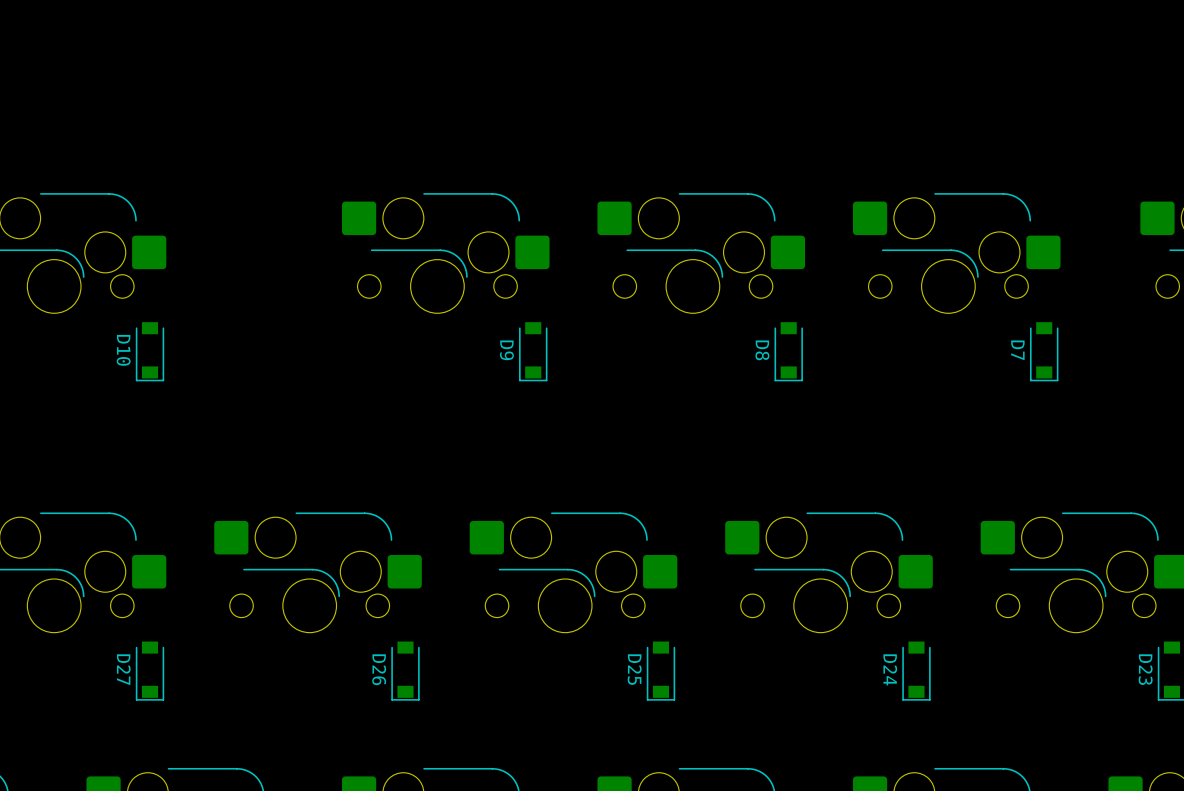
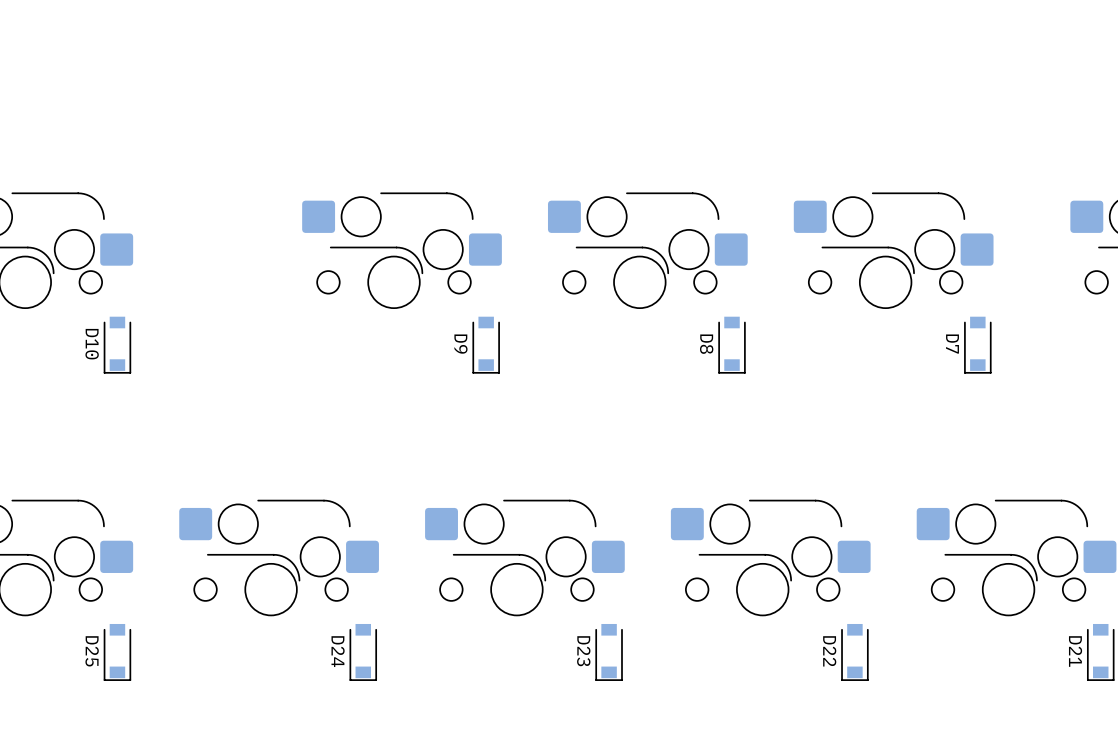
D27 name: D27 (123, 669) -> D25 (92, 651)
D26 name: D26 (379, 669) -> D24 (338, 651)
D25 name: D25 (634, 669) -> D23 (583, 651)
D24 name: D24 (890, 669) -> D22 (829, 651)
D23 name: D23 (1145, 669) -> D21 (1075, 651)

